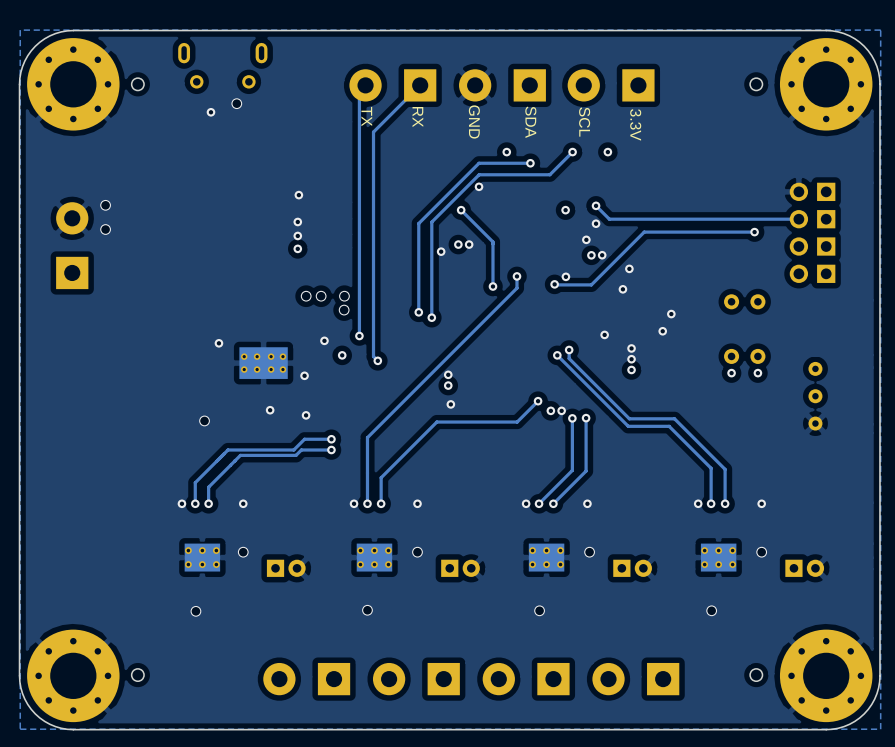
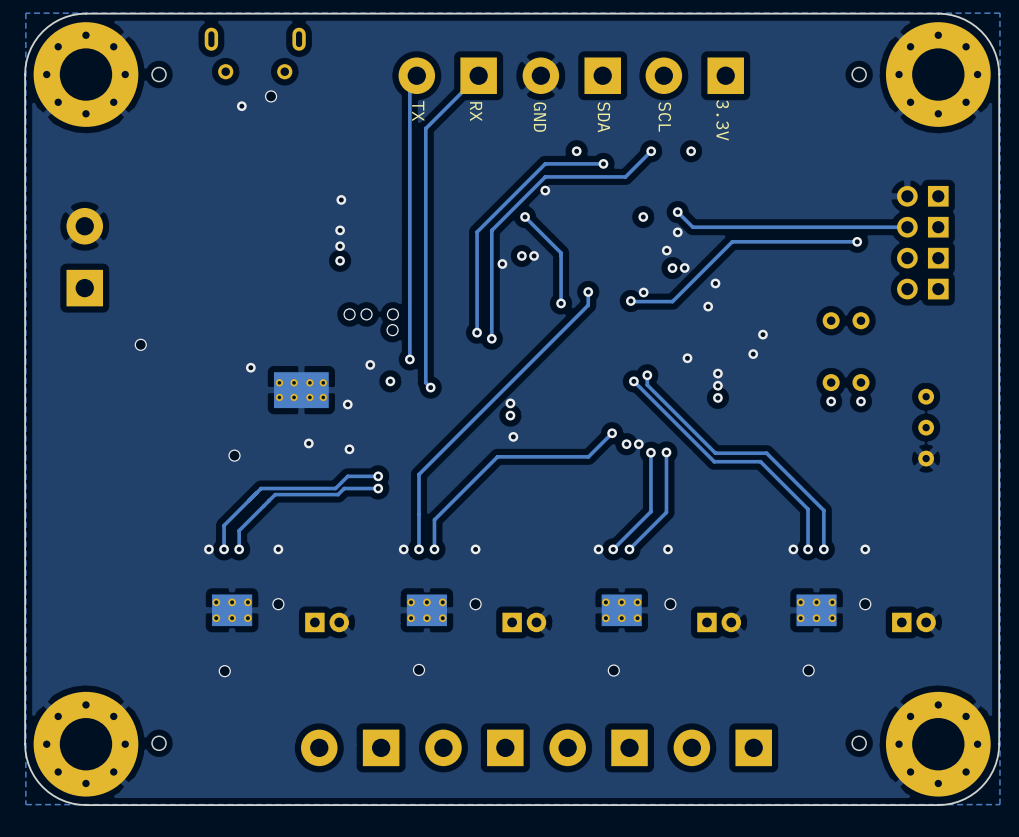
via: (105, 205) -> none
via: (105, 229) -> none
via: none -> (140, 344)

